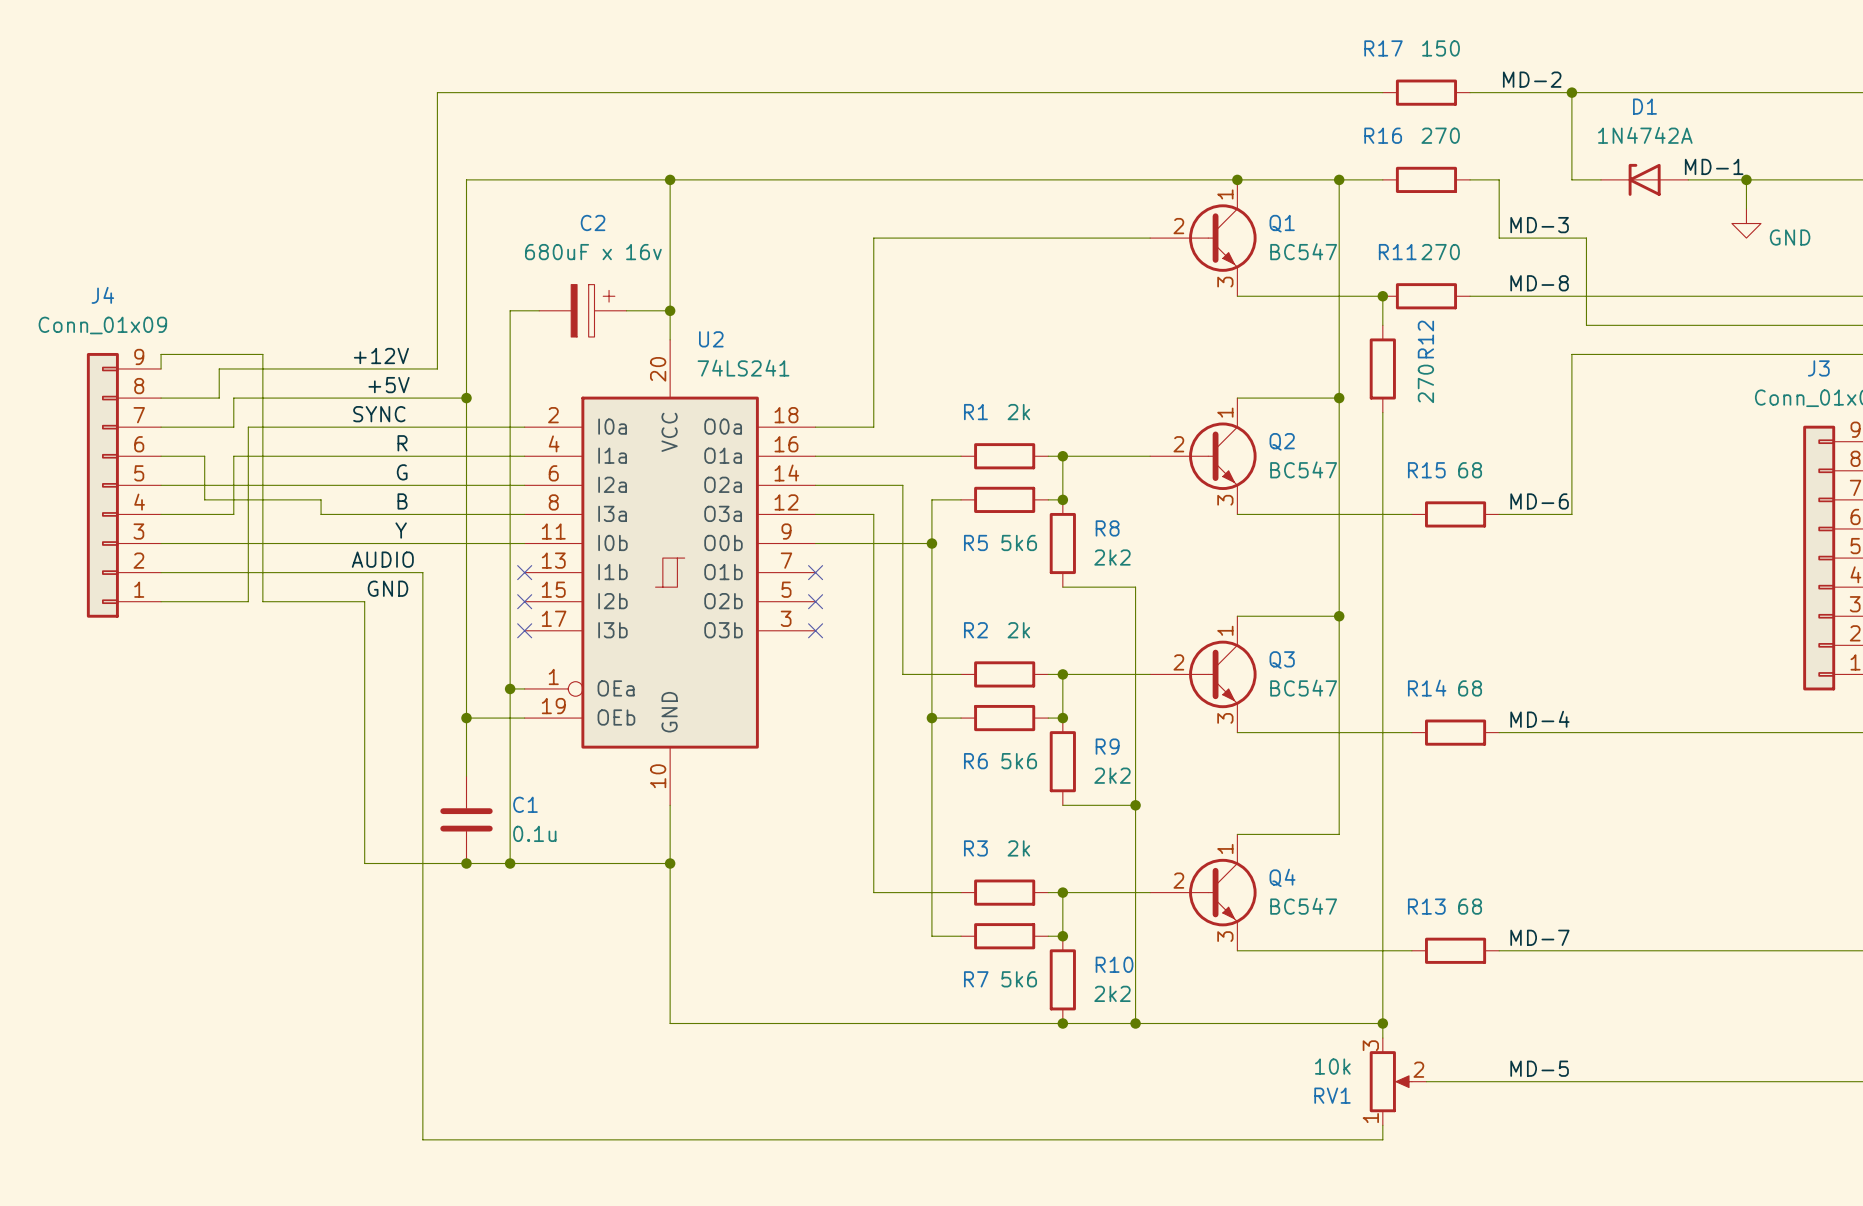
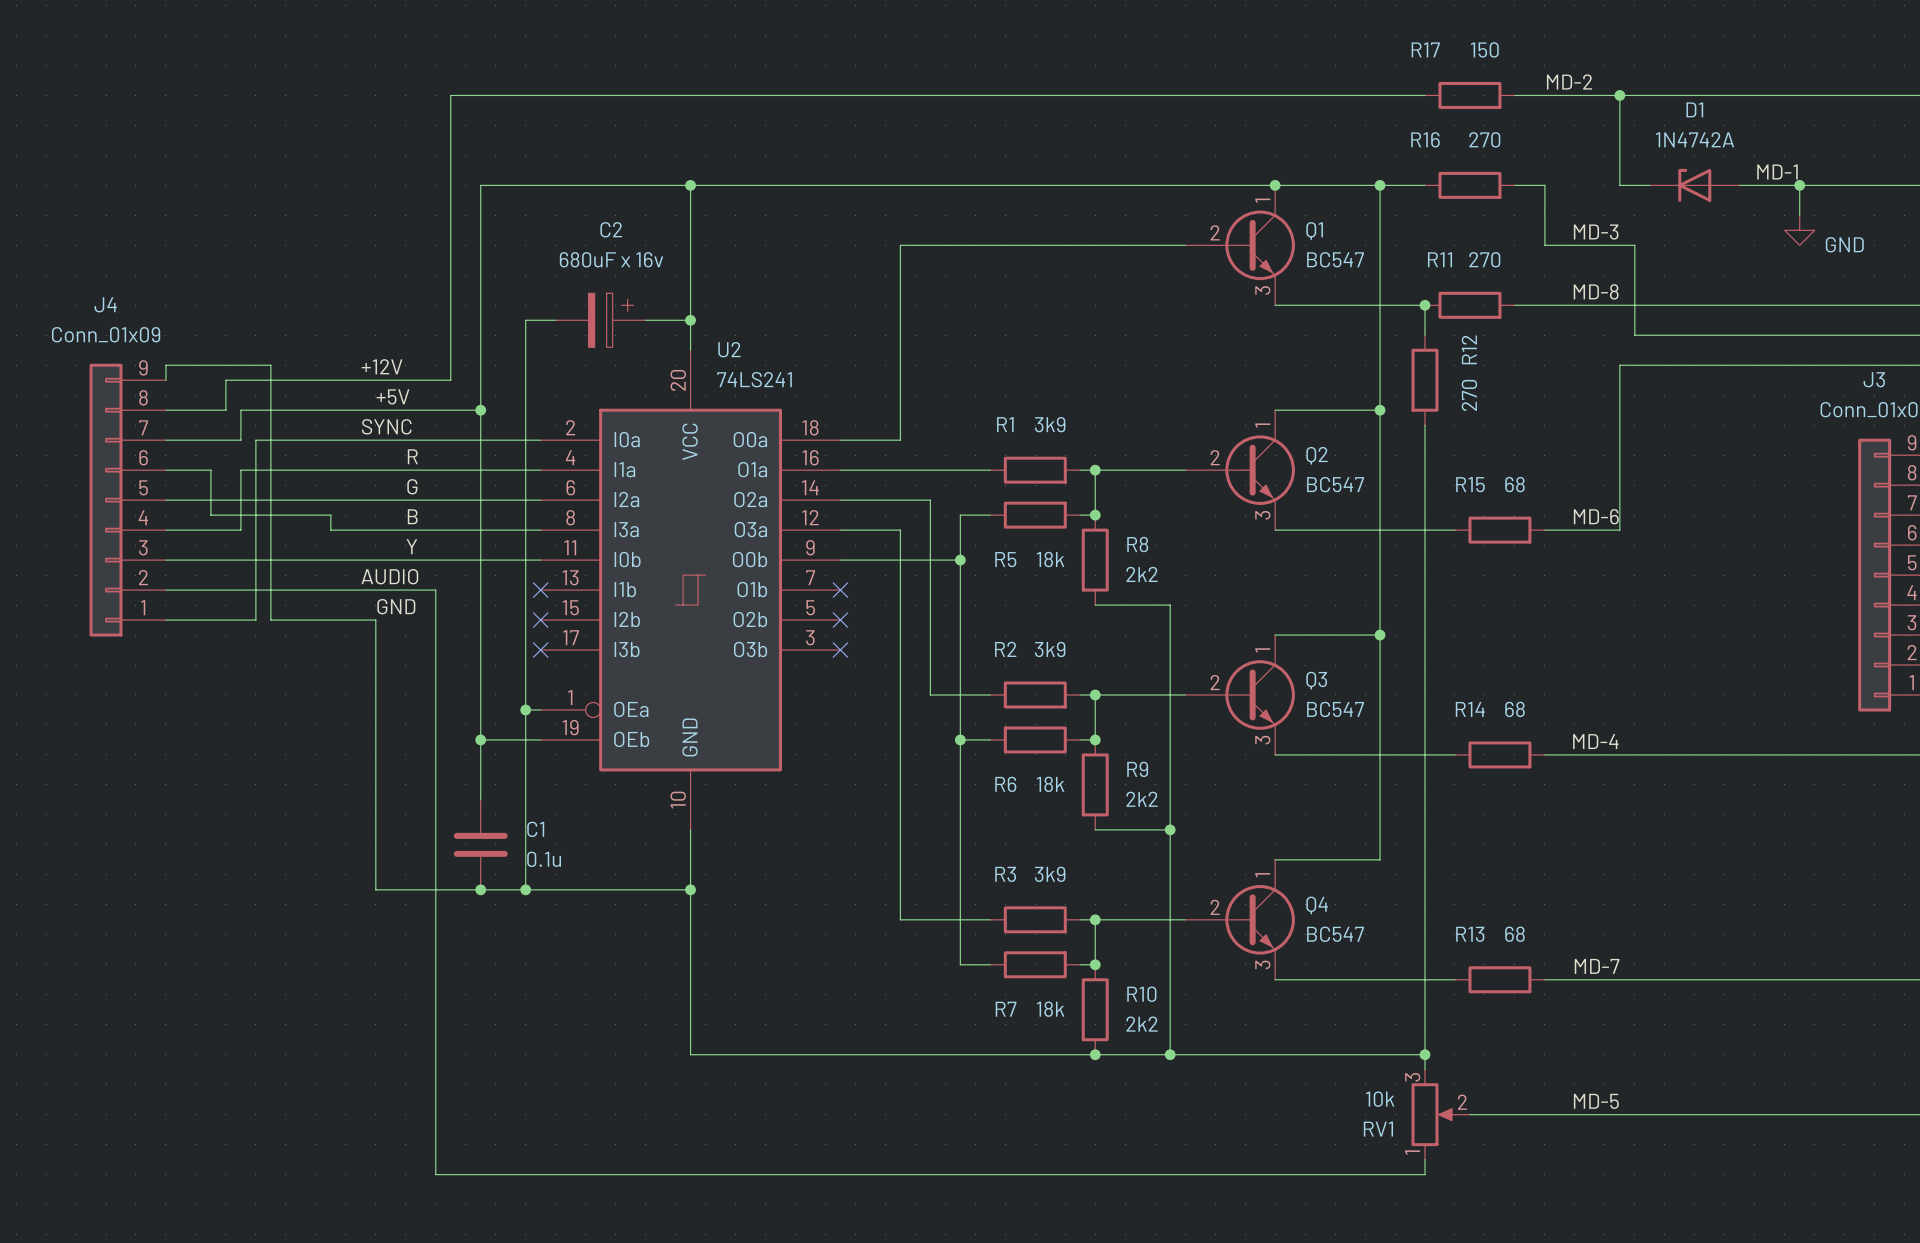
R1 value: 2k (1018, 412) -> 3k9 (1050, 424)
R5 value: 5k6 (1019, 542) -> 18k (1050, 559)
R2 value: 2k (1018, 630) -> 3k9 (1050, 649)
R6 value: 5k6 (1019, 761) -> 18k (1050, 784)
R3 value: 2k (1018, 848) -> 3k9 (1050, 874)
R7 value: 5k6 (1019, 979) -> 18k (1050, 1009)

